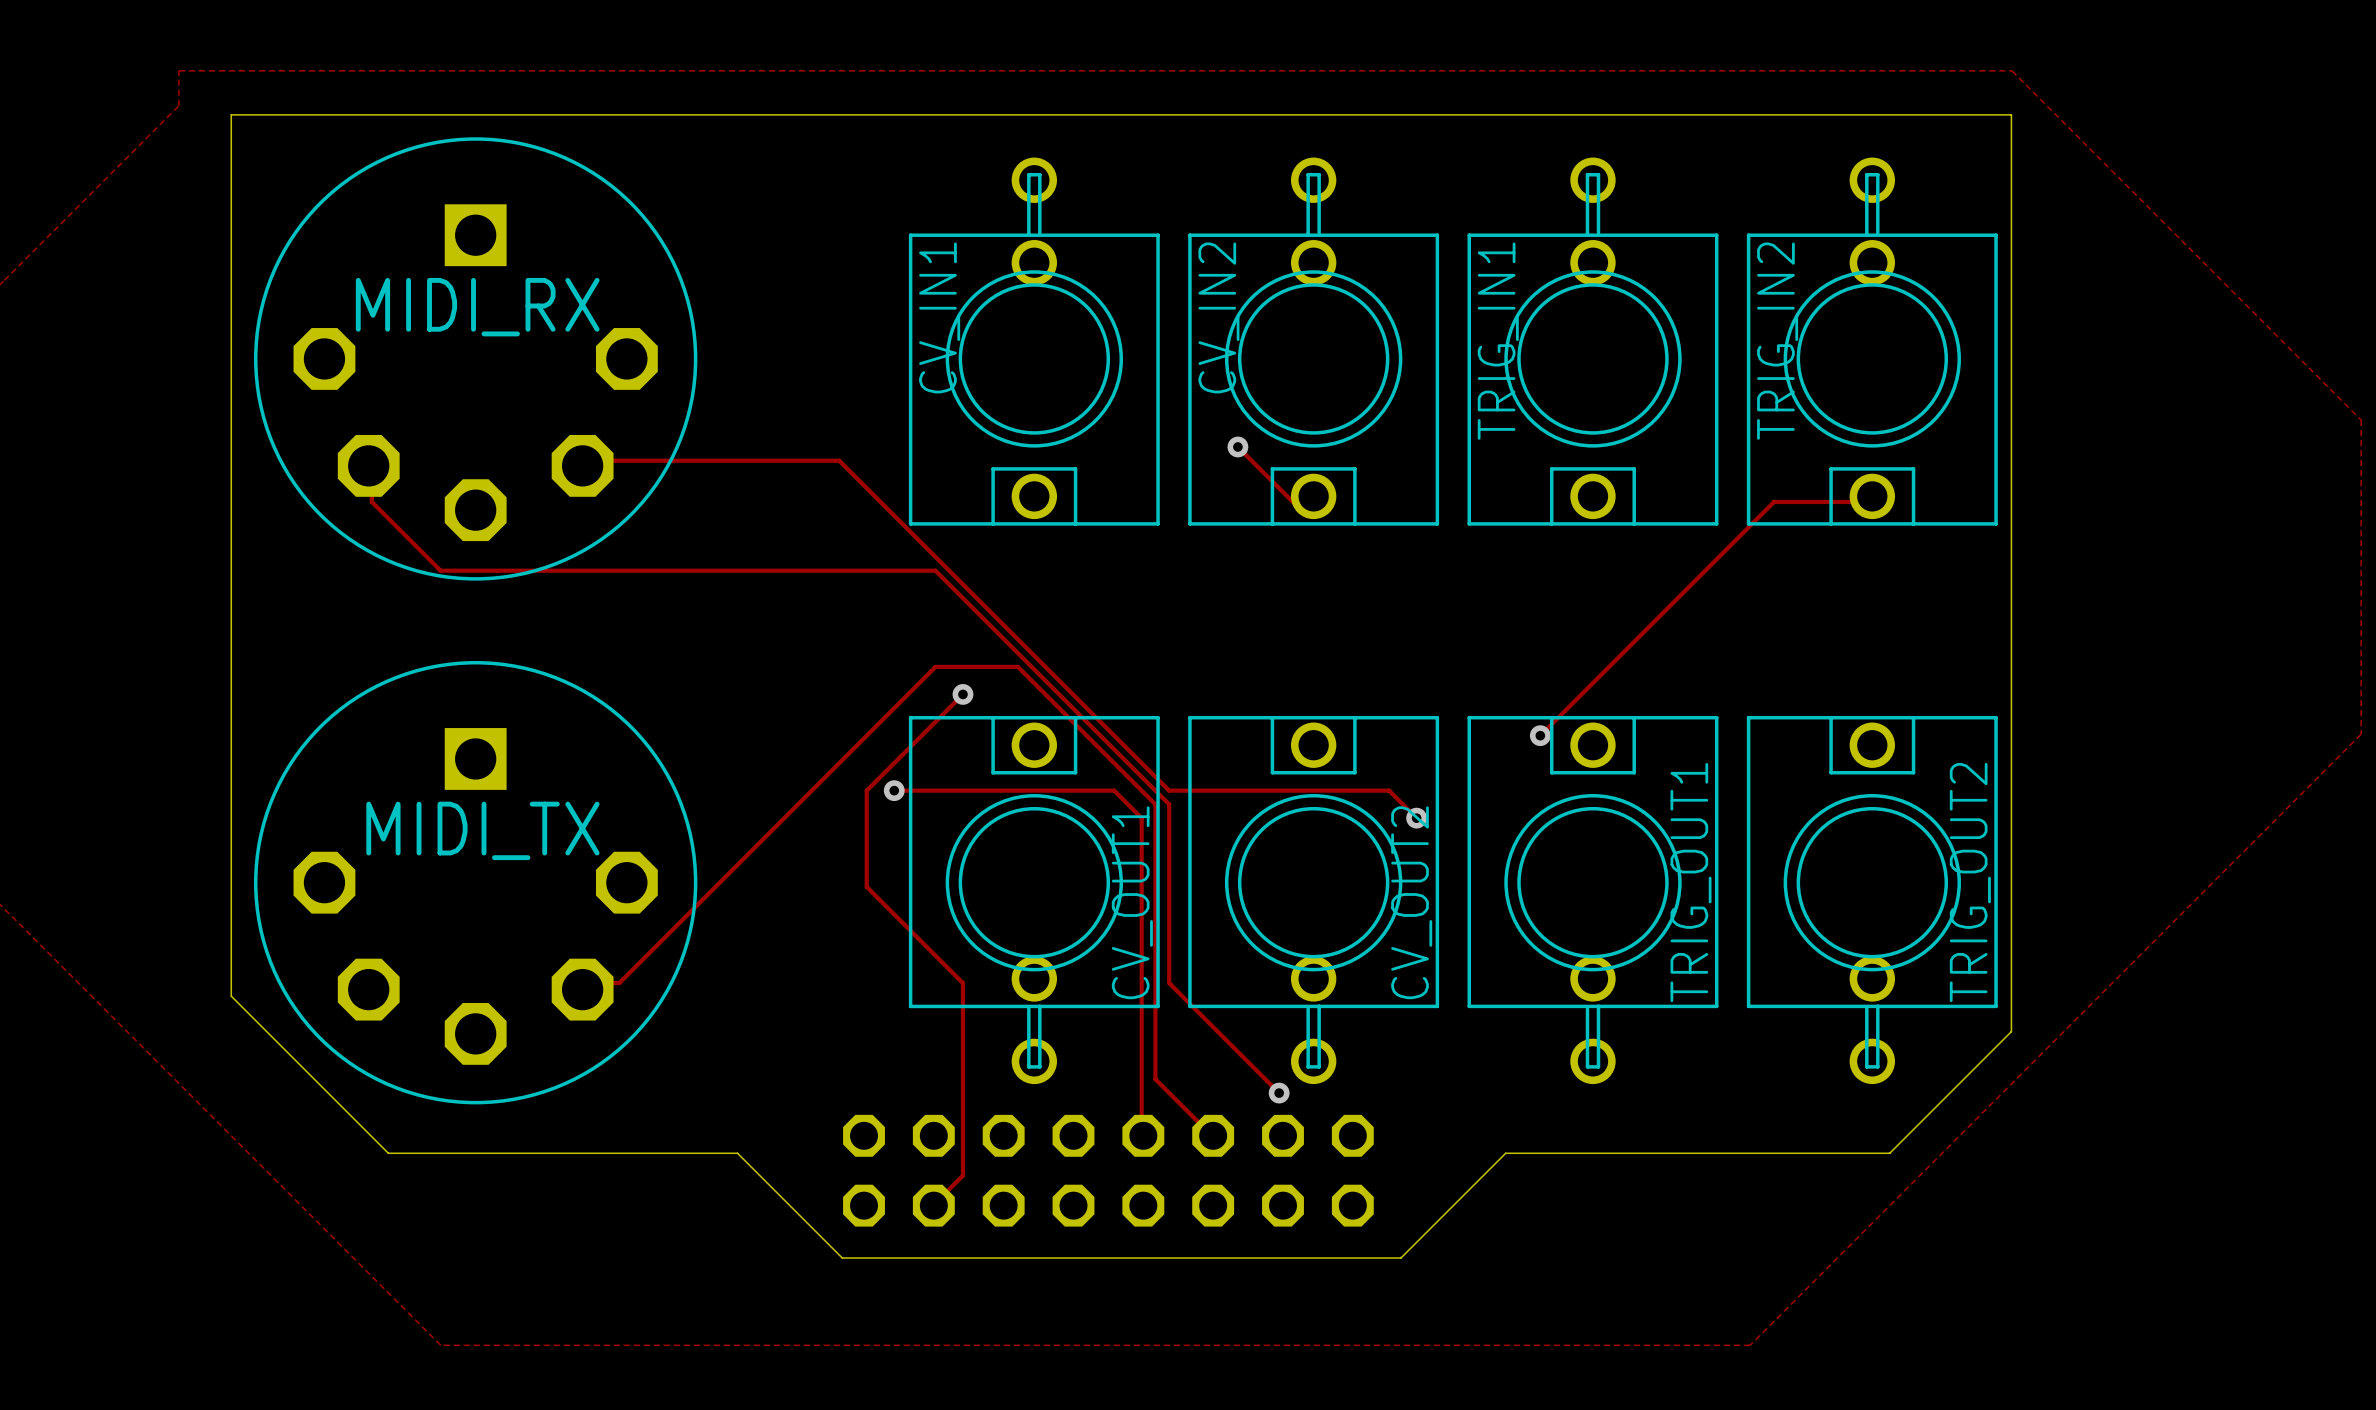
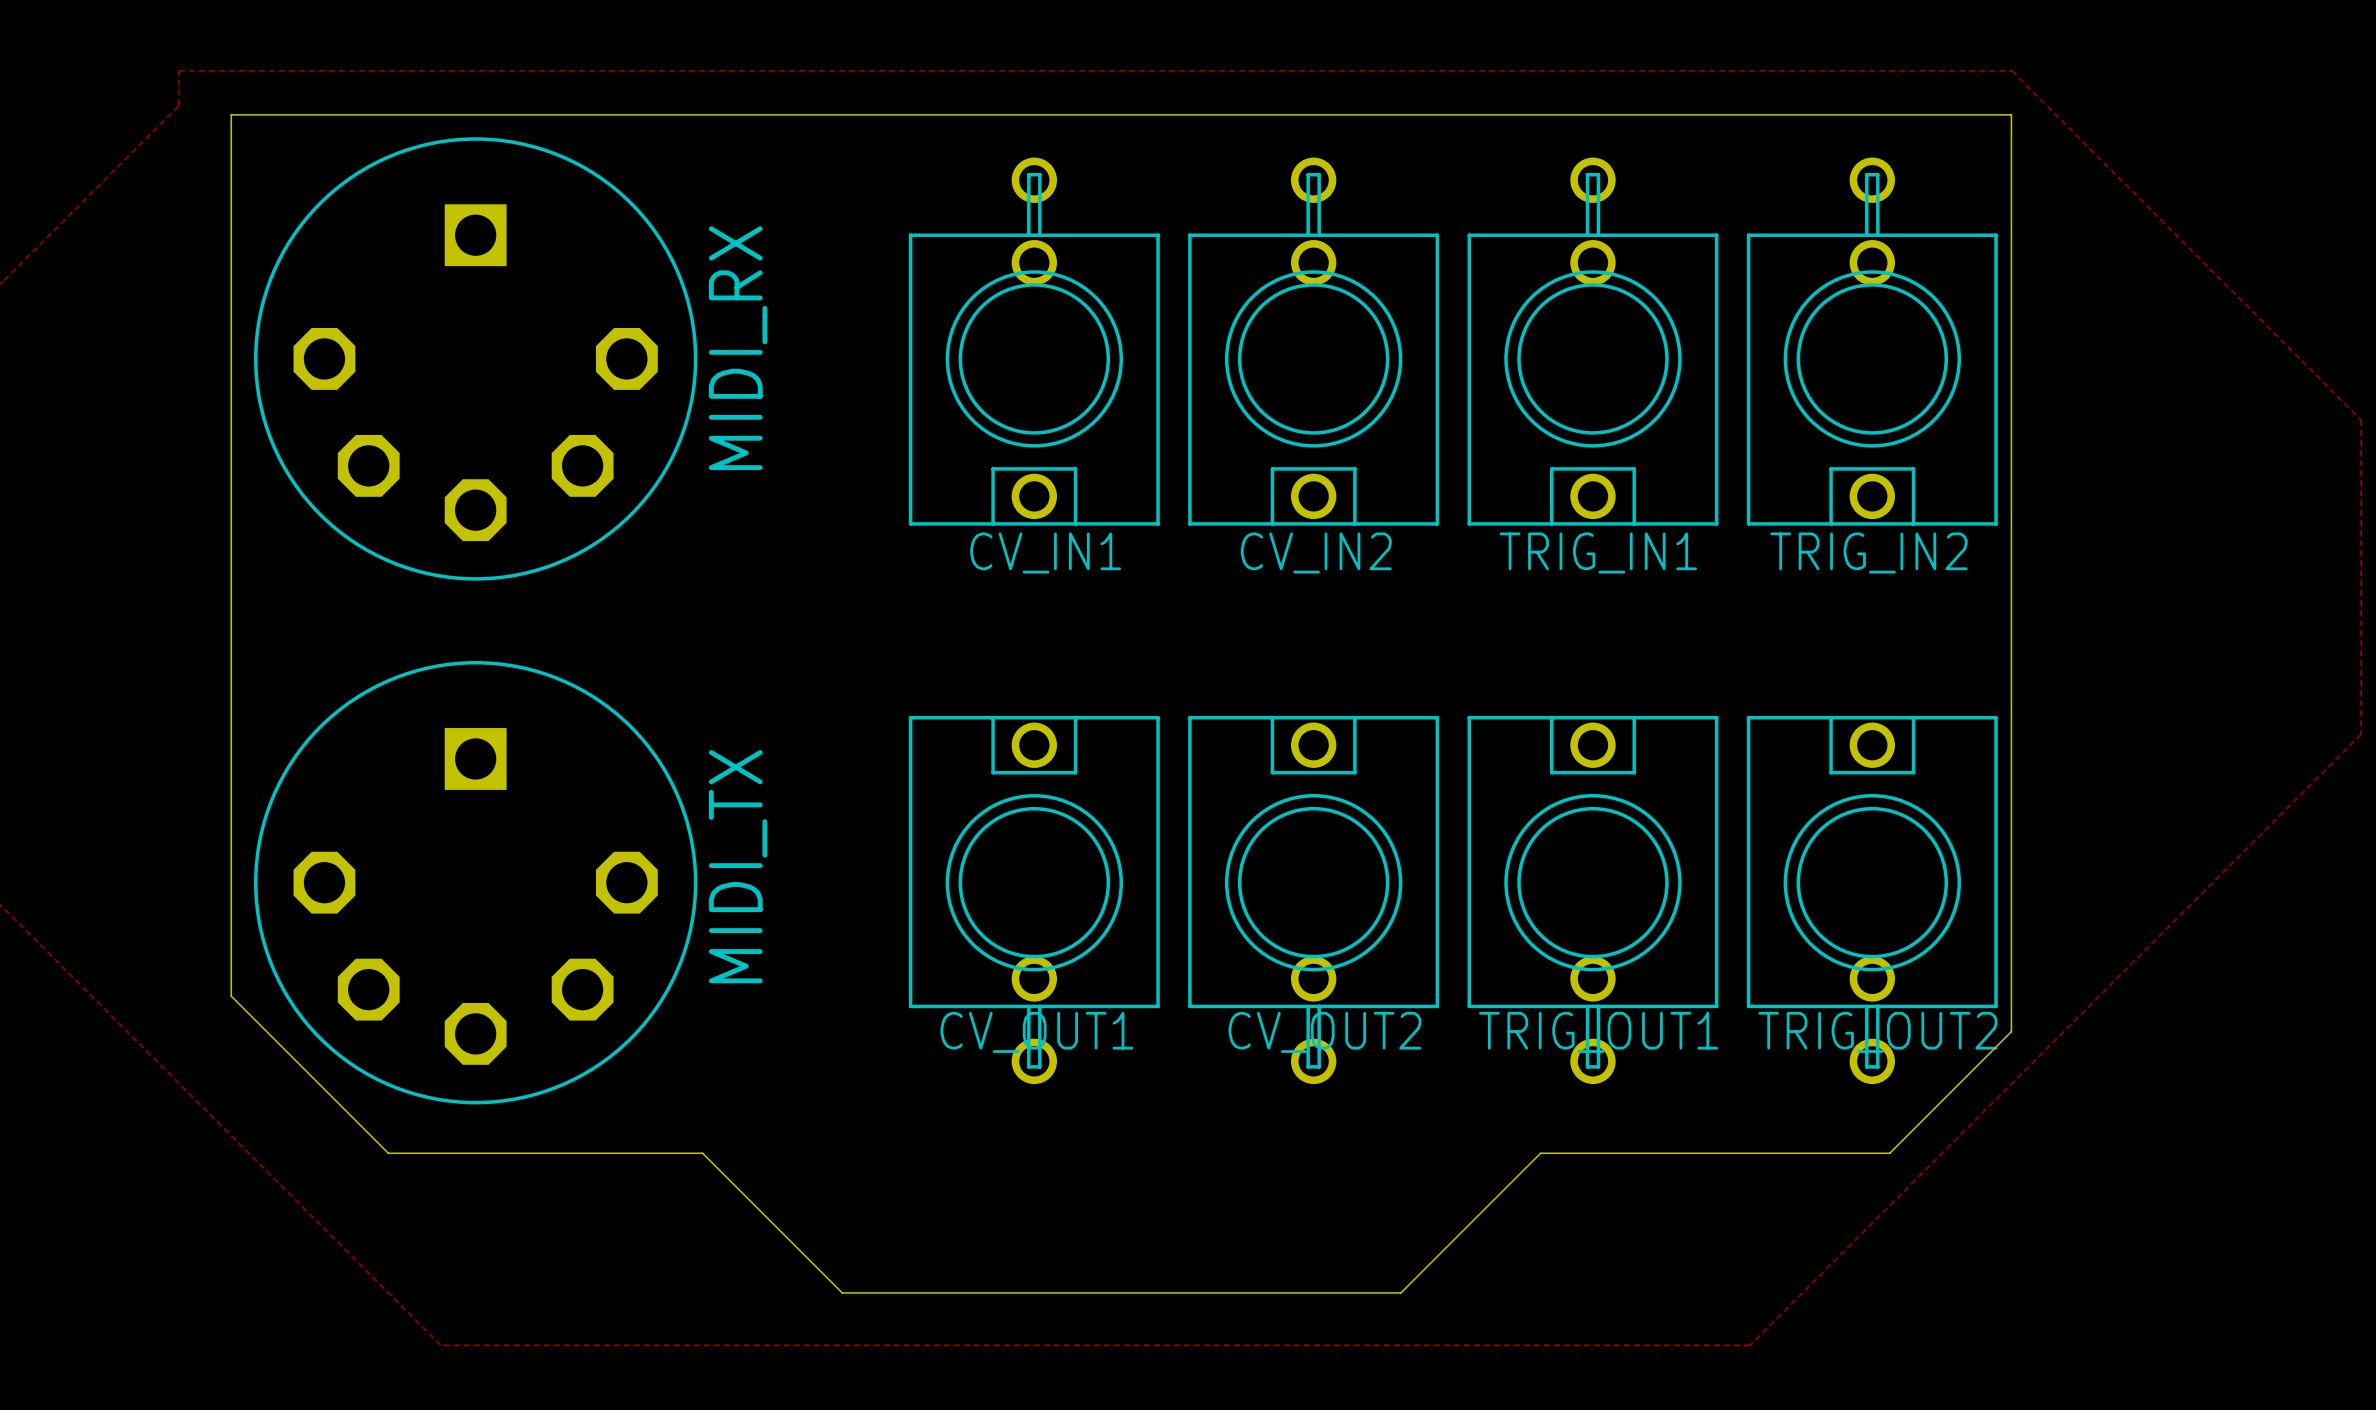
MIDI_RX name rotation: 0° (477, 307) -> 90° counterclockwise (738, 348)
CV_IN1 name rotation: 0° (939, 317) -> 90° clockwise (1045, 552)
CV_IN1 name position: CV_IN1 (939, 317) -> CV_IN1 (1045, 552)
CV_IN2 name rotation: 0° (1218, 317) -> 90° clockwise (1316, 552)
CV_IN2 name position: CV_IN2 (1218, 317) -> CV_IN2 (1316, 552)
TRIG_IN1 name rotation: 0° (1498, 341) -> 90° clockwise (1598, 552)
TRIG_IN2 name rotation: 0° (1777, 341) -> 90° clockwise (1868, 552)
track: (1237, 446) (1306, 515) (1320, 501) (1313, 496) -> none
via: (1237, 446) -> none
track: (368, 465) (371, 474) (371, 501) (440, 570) (935, 570) (1169, 804) (1169, 983) (1279, 1093) -> none
track: (582, 465) (591, 460) (839, 460) (1169, 790) (1389, 790) (1416, 818) -> none
track: (1872, 496) (1870, 501) (1774, 501) (1540, 735) -> none
track: (962, 694) (866, 790) (866, 886) (962, 983) (962, 1175) (933, 1205) -> none
via: (962, 694) -> none
via: (1540, 735) -> none
track: (894, 790) (1114, 790) (1141, 818) (1141, 1134) (1143, 1135) -> none
via: (894, 790) -> none
via: (1416, 818) -> none
MIDI_TX name rotation: 0° (482, 830) -> 90° counterclockwise (738, 866)
TRIG_OUT1 name rotation: 0° (1691, 882) -> 90° clockwise (1598, 1032)
TRIG_OUT2 name rotation: 0° (1970, 882) -> 90° clockwise (1877, 1032)
CV_OUT1 name rotation: 0° (1132, 902) -> 90° clockwise (1036, 1032)
CV_OUT2 name rotation: 0° (1411, 902) -> 90° clockwise (1324, 1032)
track: (582, 989) (591, 983) (619, 983) (935, 666) (1017, 666) (1155, 804) (1155, 1079) (1213, 1135) -> none
via: (1279, 1093) -> none
board edge: (702, 1153) (737, 1153) (842, 1258) (1400, 1258) (1505, 1153) (1540, 1153) -> (702, 1153) (842, 1292) (1400, 1292) (1540, 1153)
part: (1108, 1170) -> none

